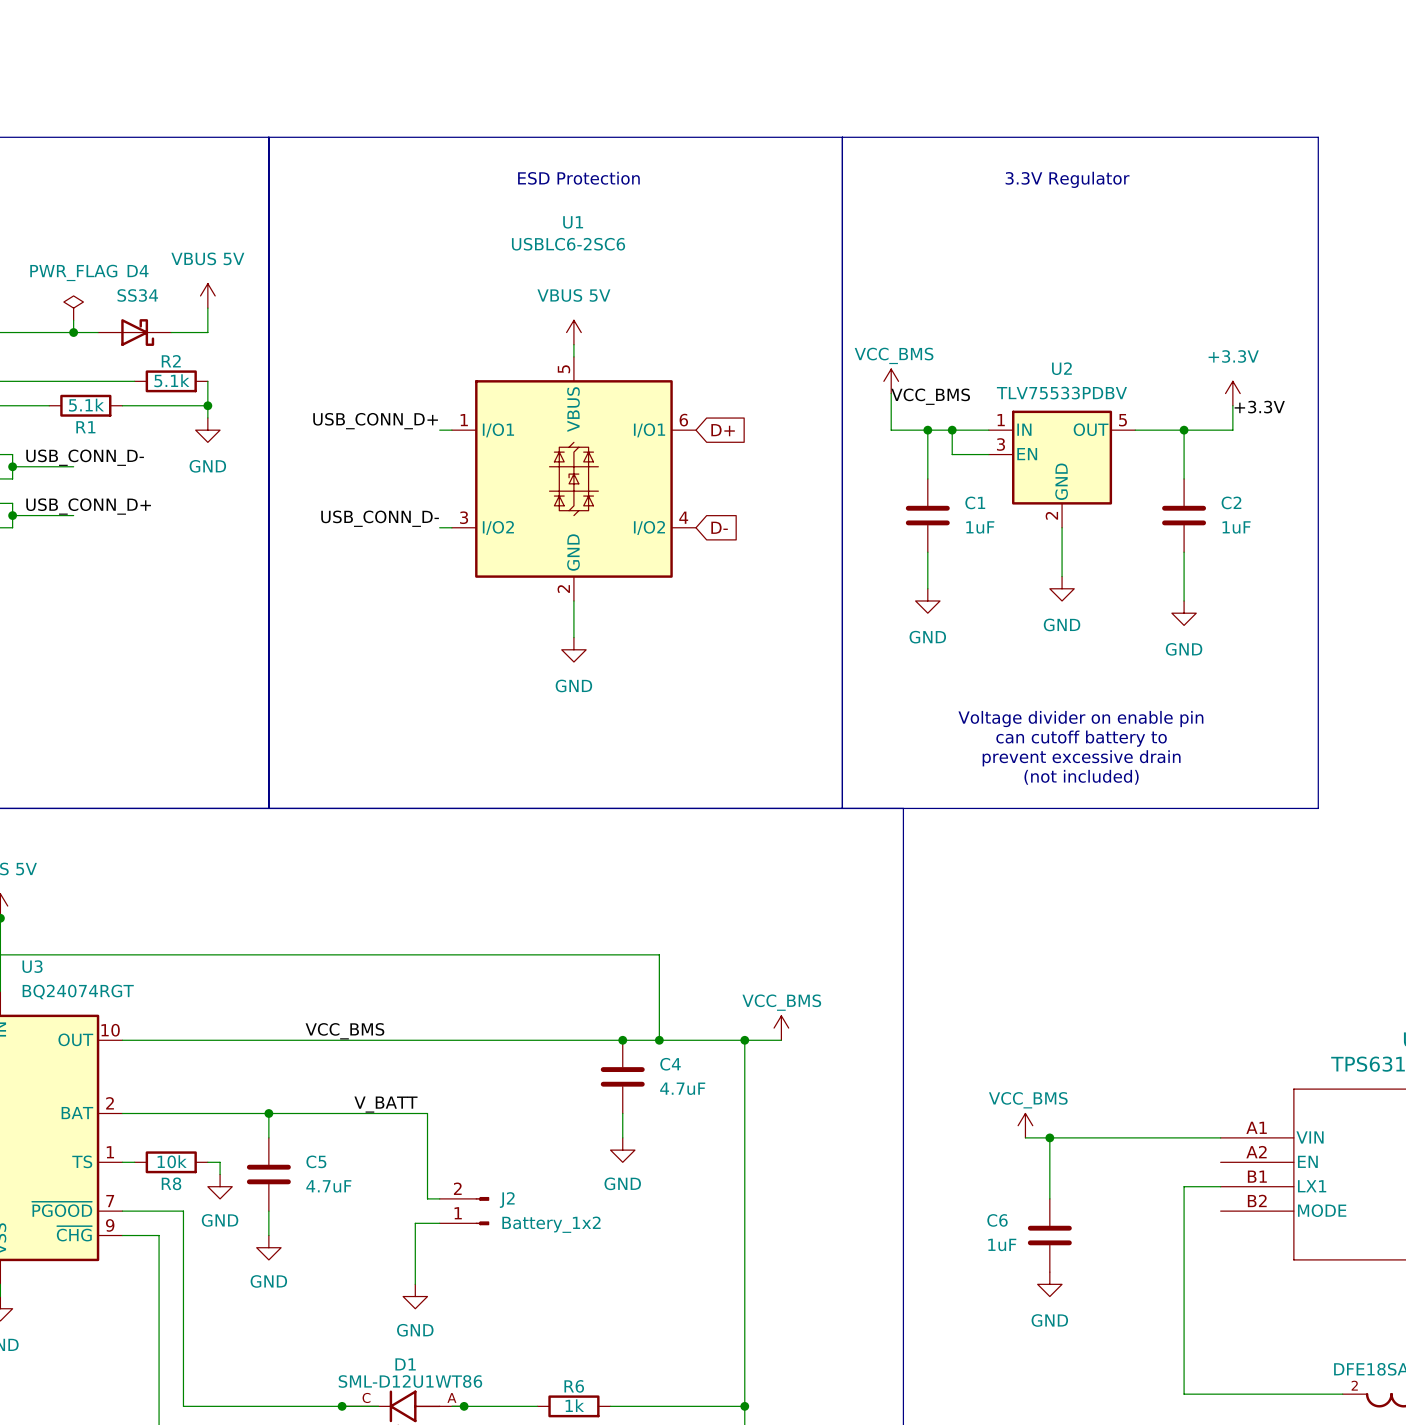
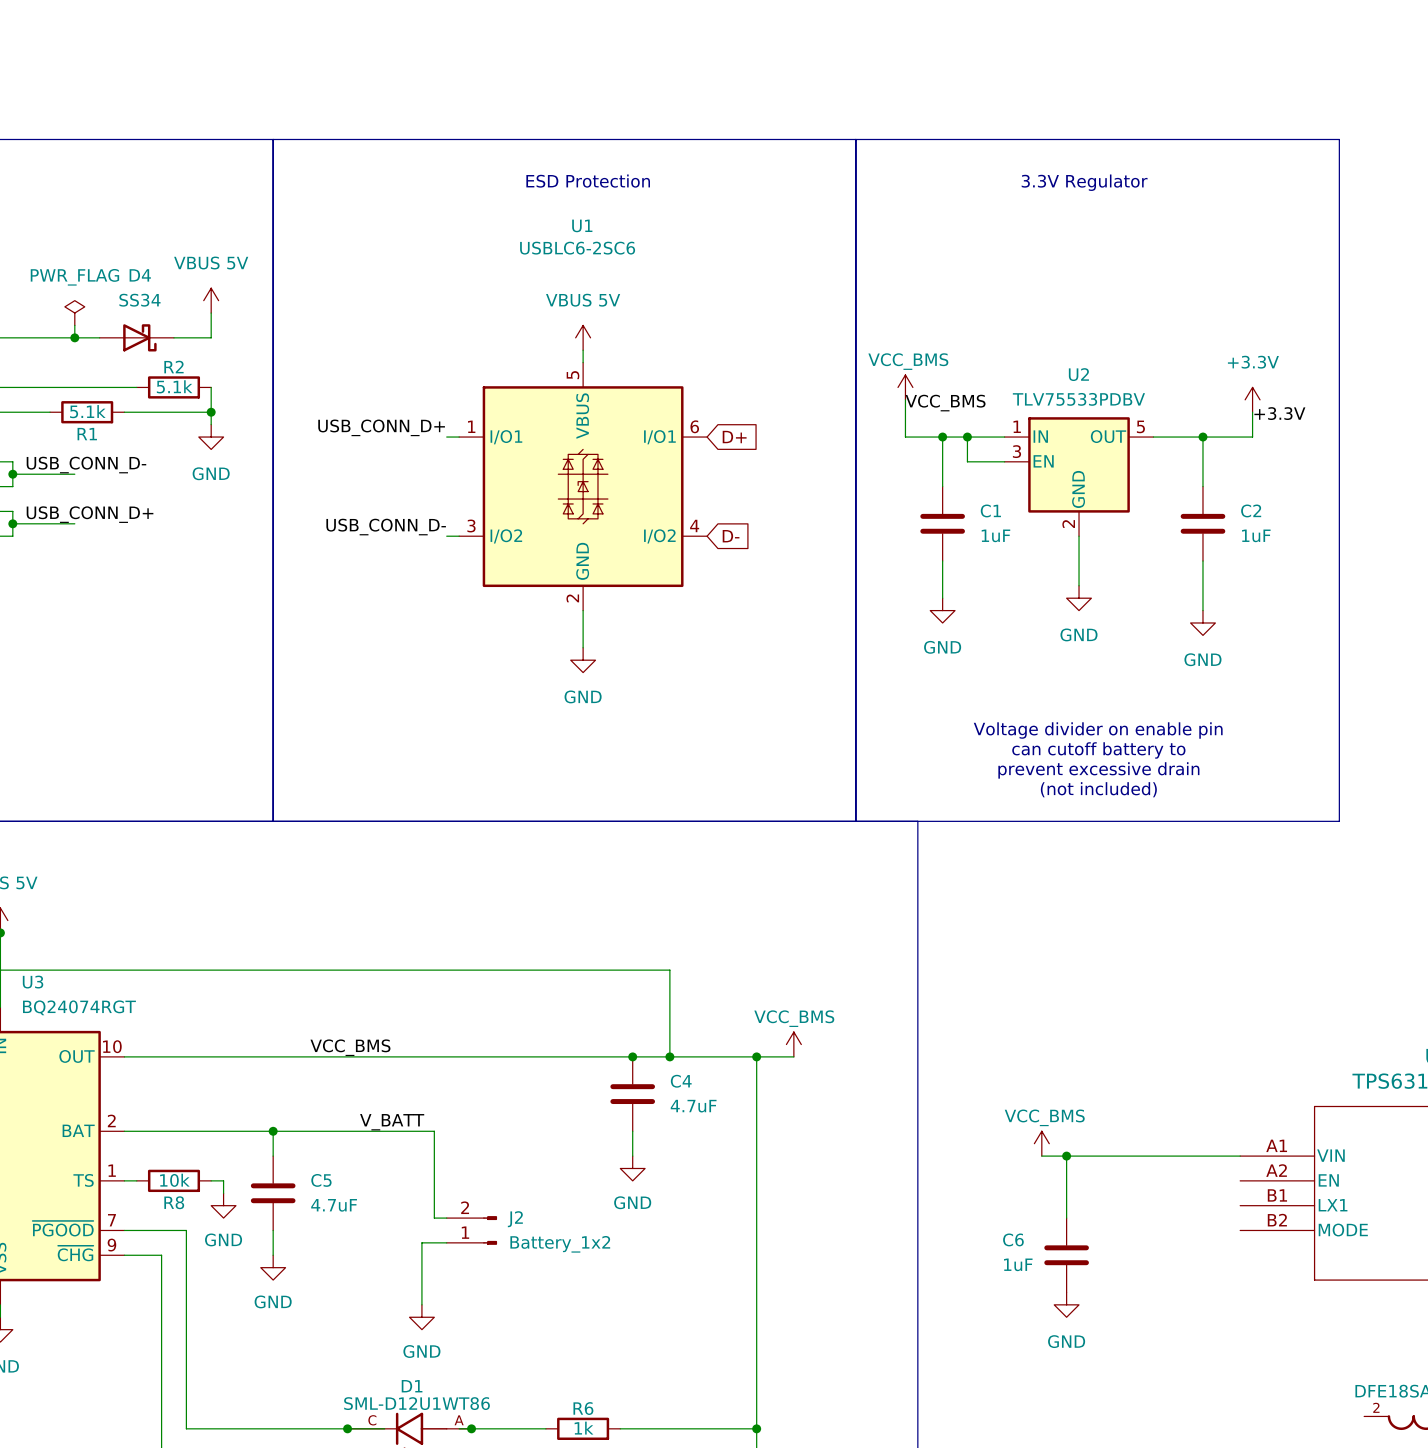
wire: (1220, 1186) (1184, 1186) (1184, 1394) (1342, 1394) -> none

